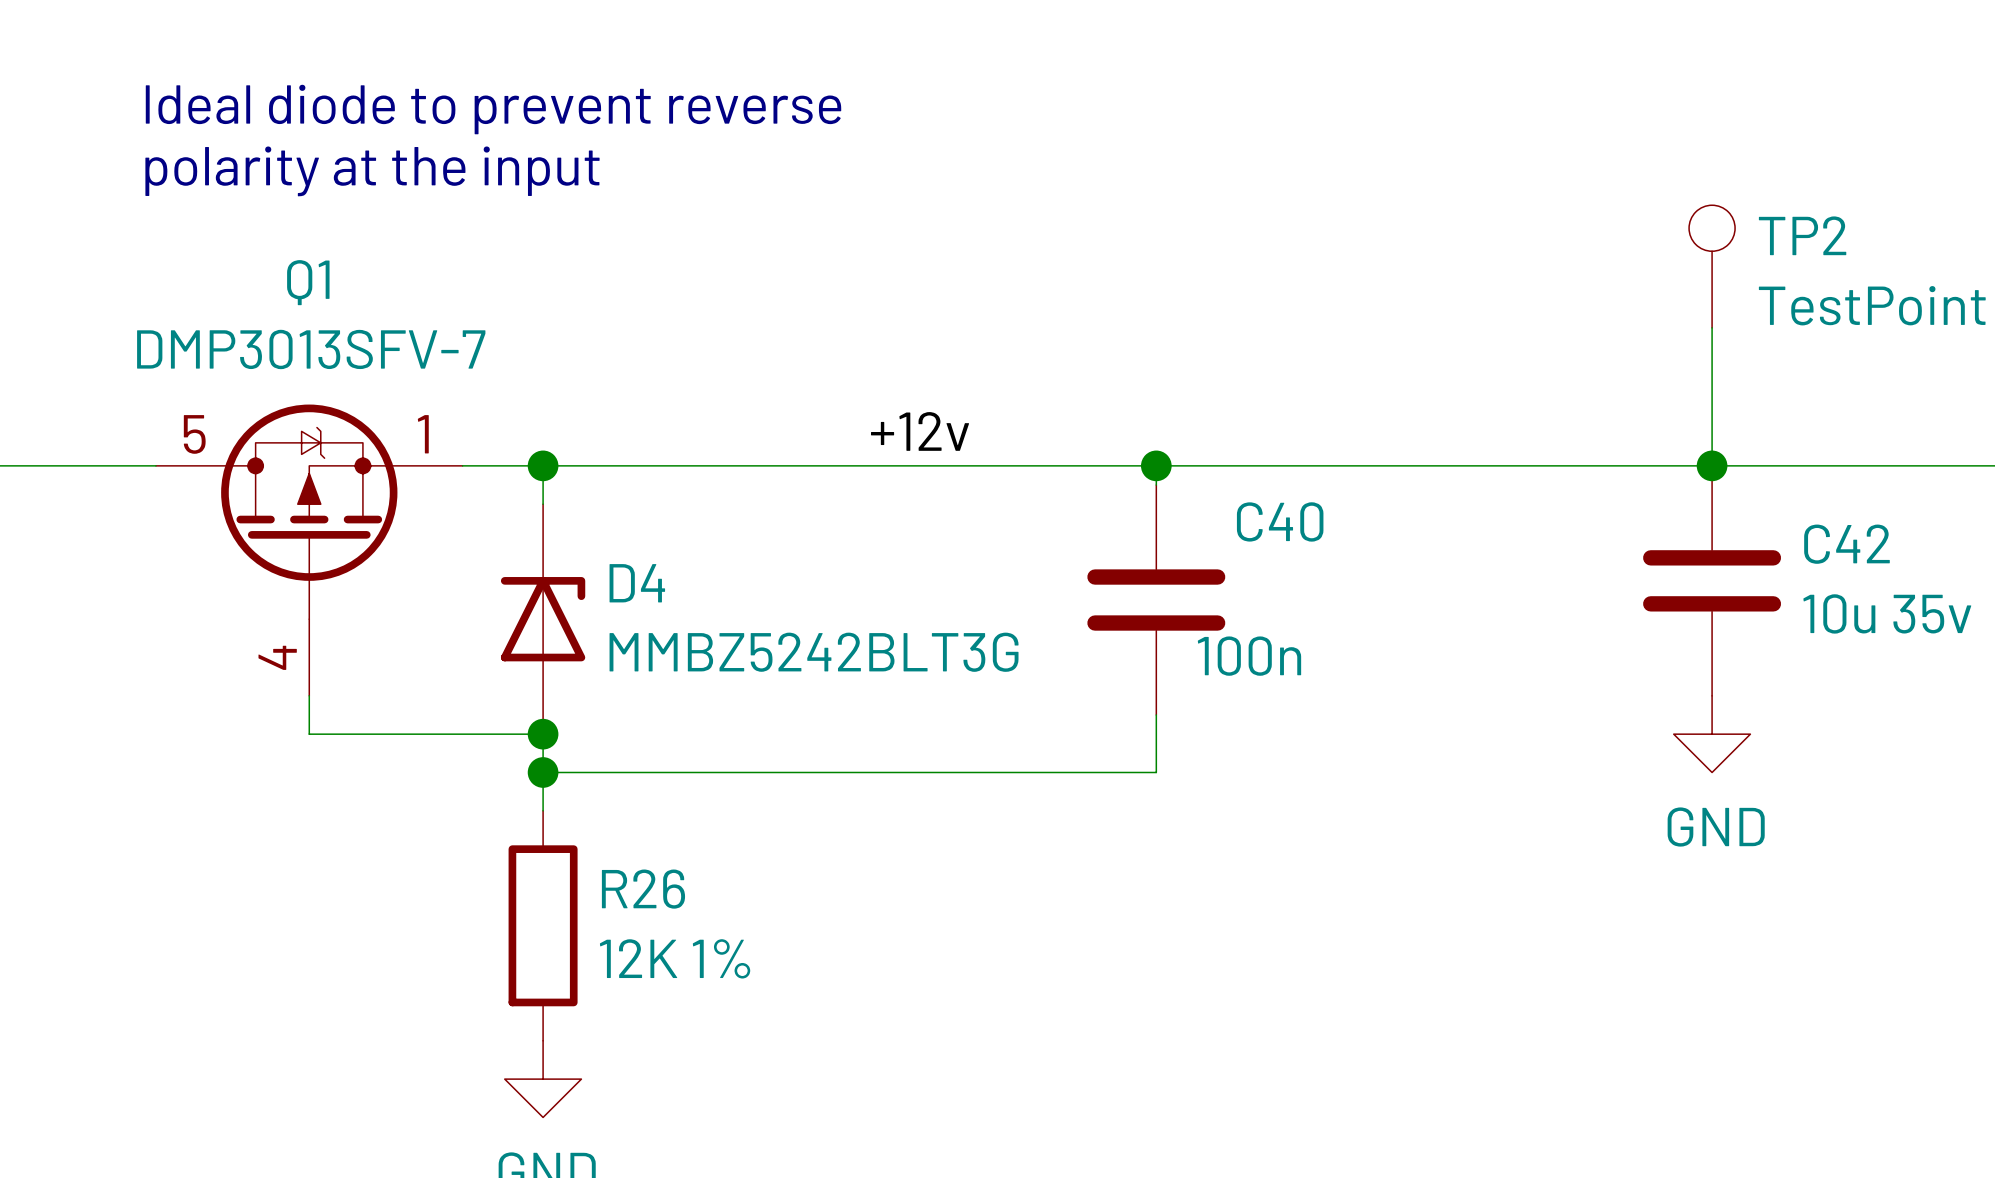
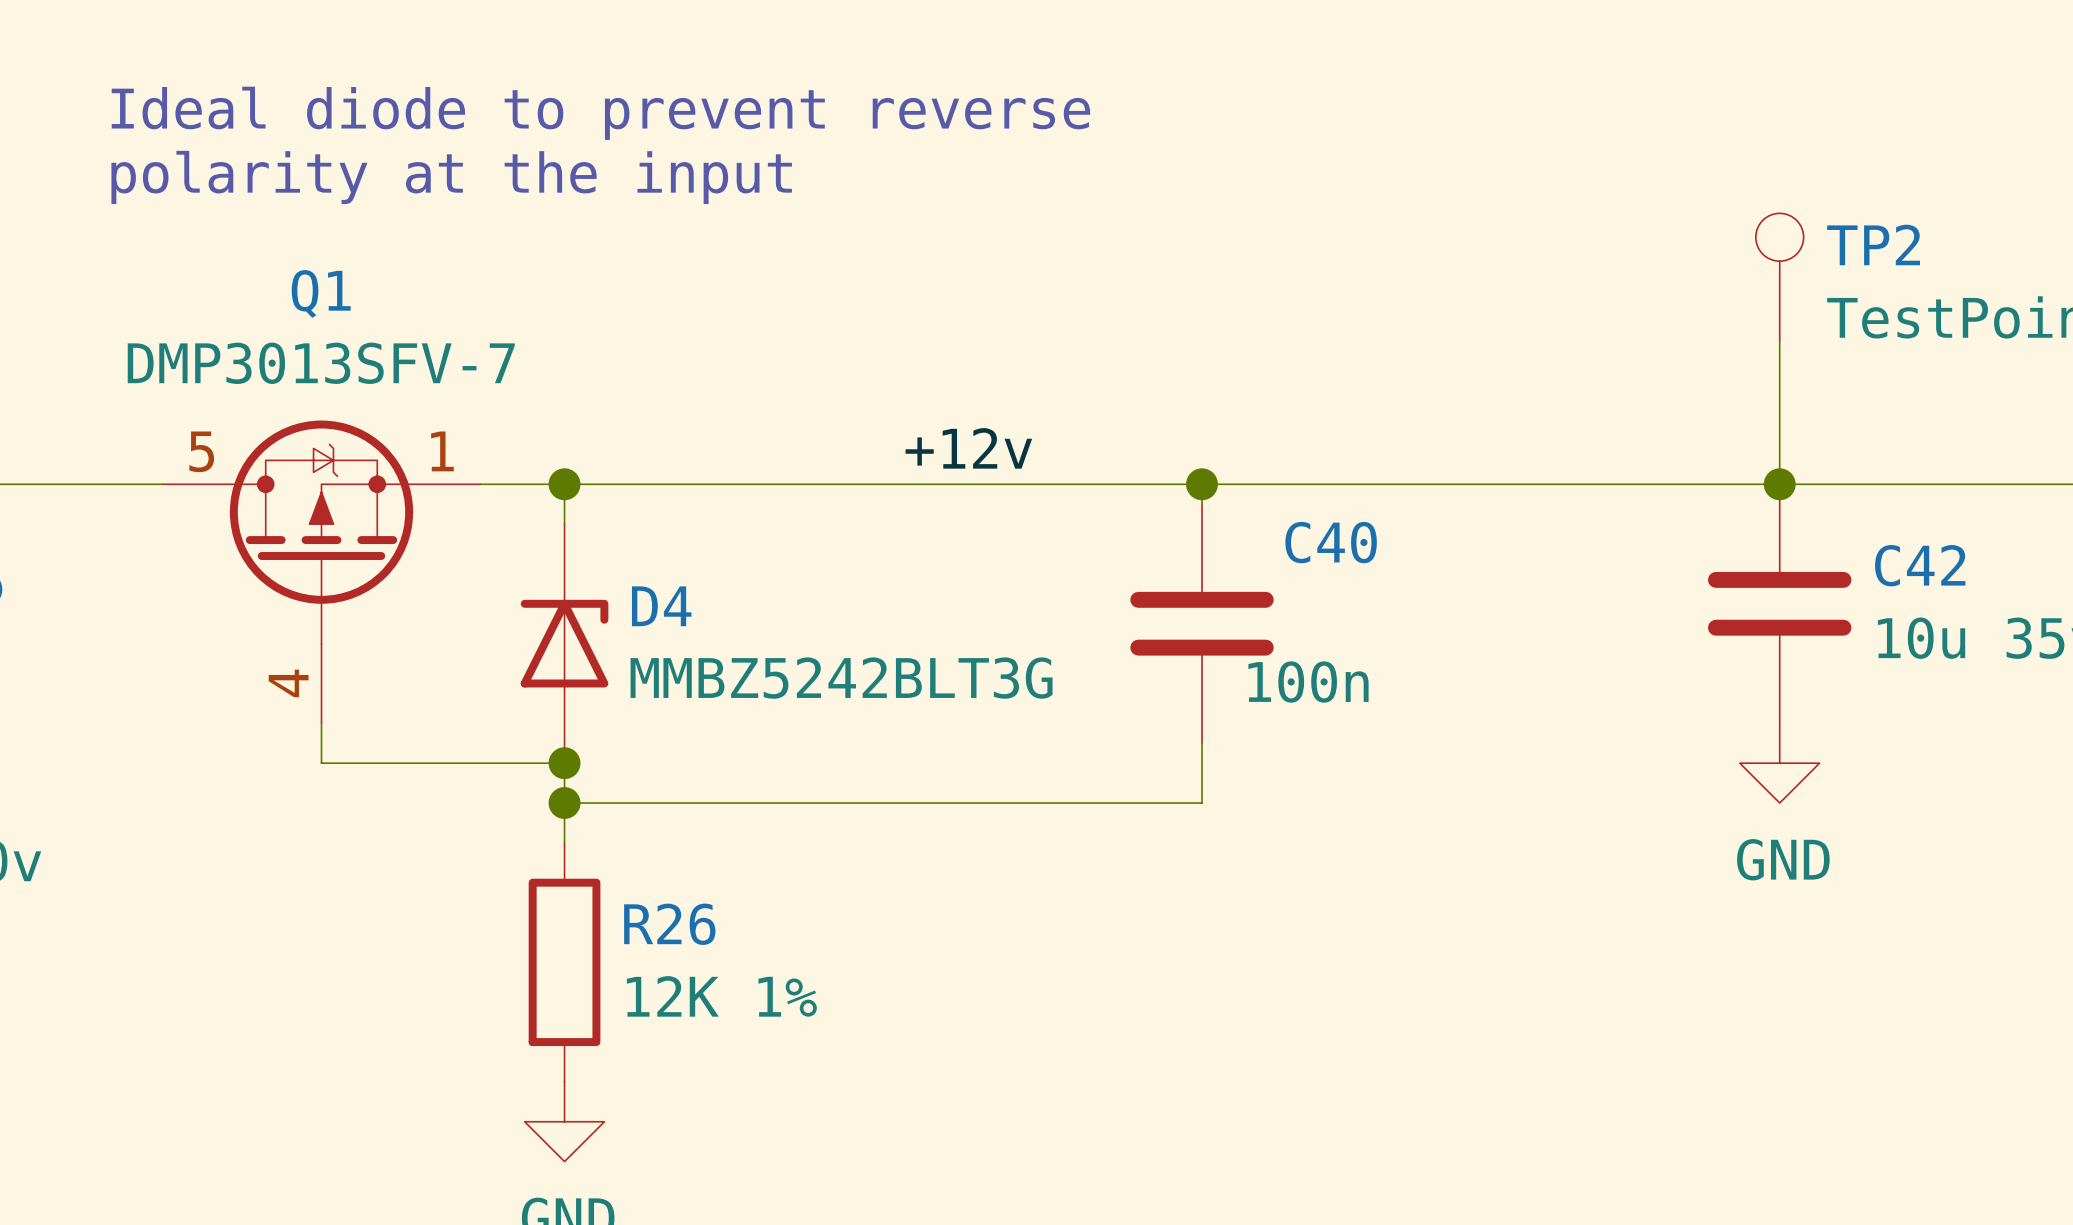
text position: Ideal diode to prevent reverse (493, 109) -> Ideal diode to prevent reverse (600, 113)
text position: polarity at the input (372, 171) -> polarity at the input (451, 177)

